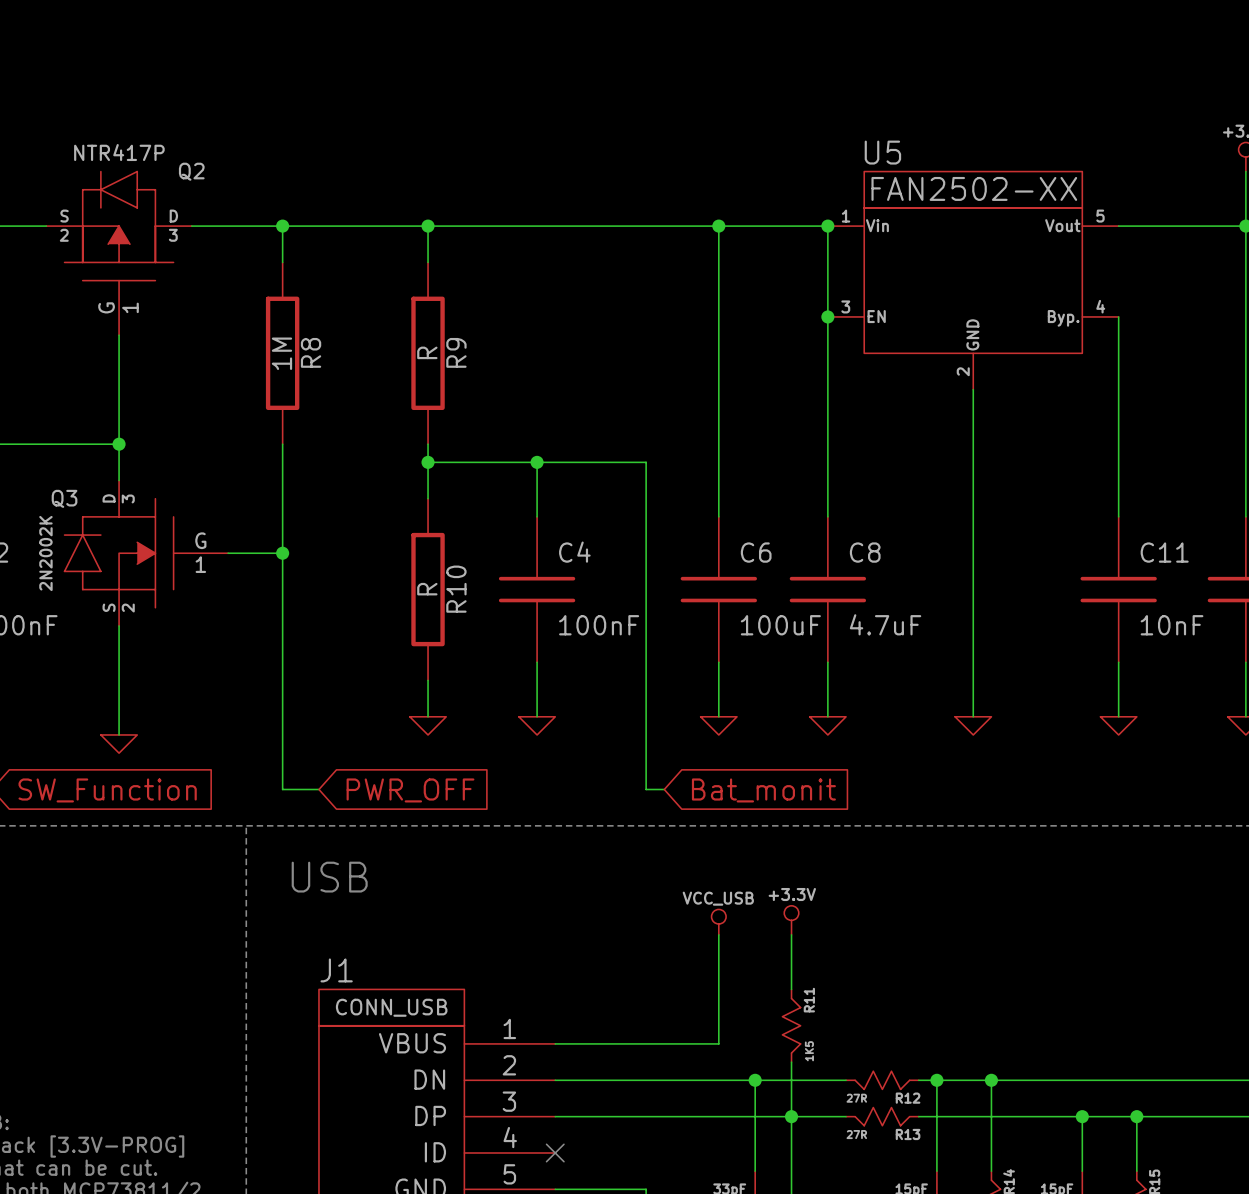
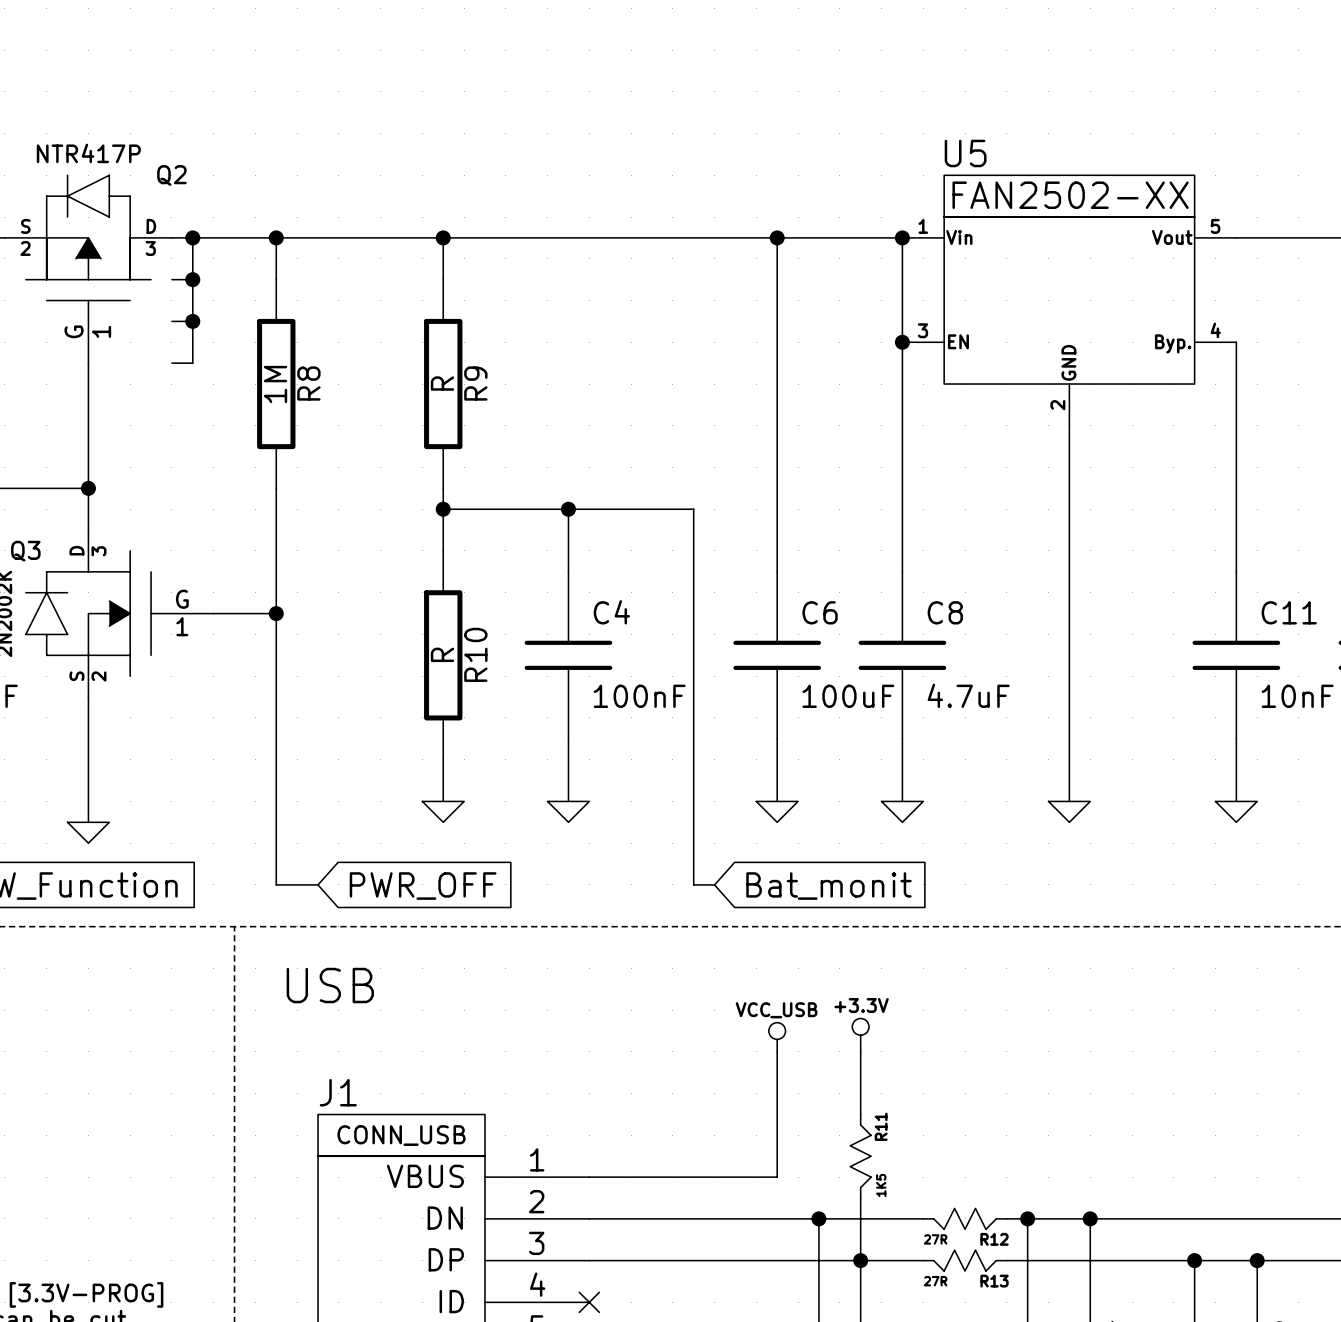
wire: none -> (192, 237) (192, 363) (171, 363)
junction: none -> (192, 237)
wire: none -> (171, 279) (192, 279)
junction: none -> (192, 279)
wire: none -> (171, 321) (192, 321)
junction: none -> (192, 321)

